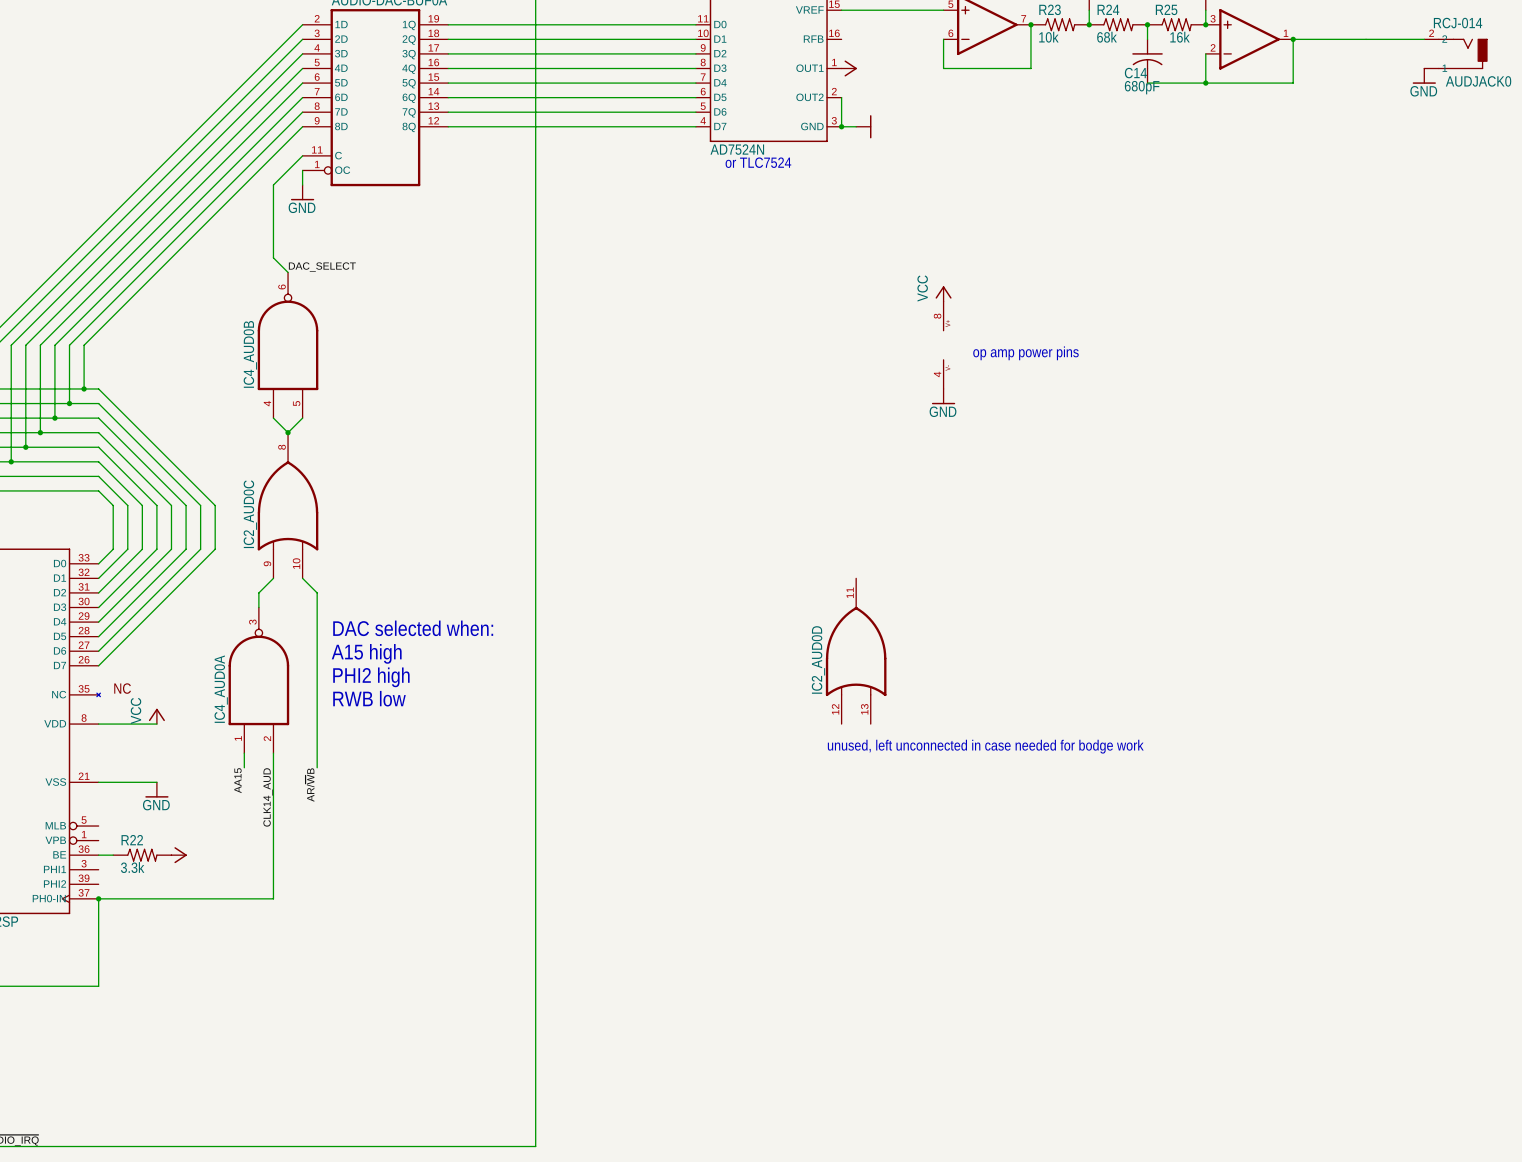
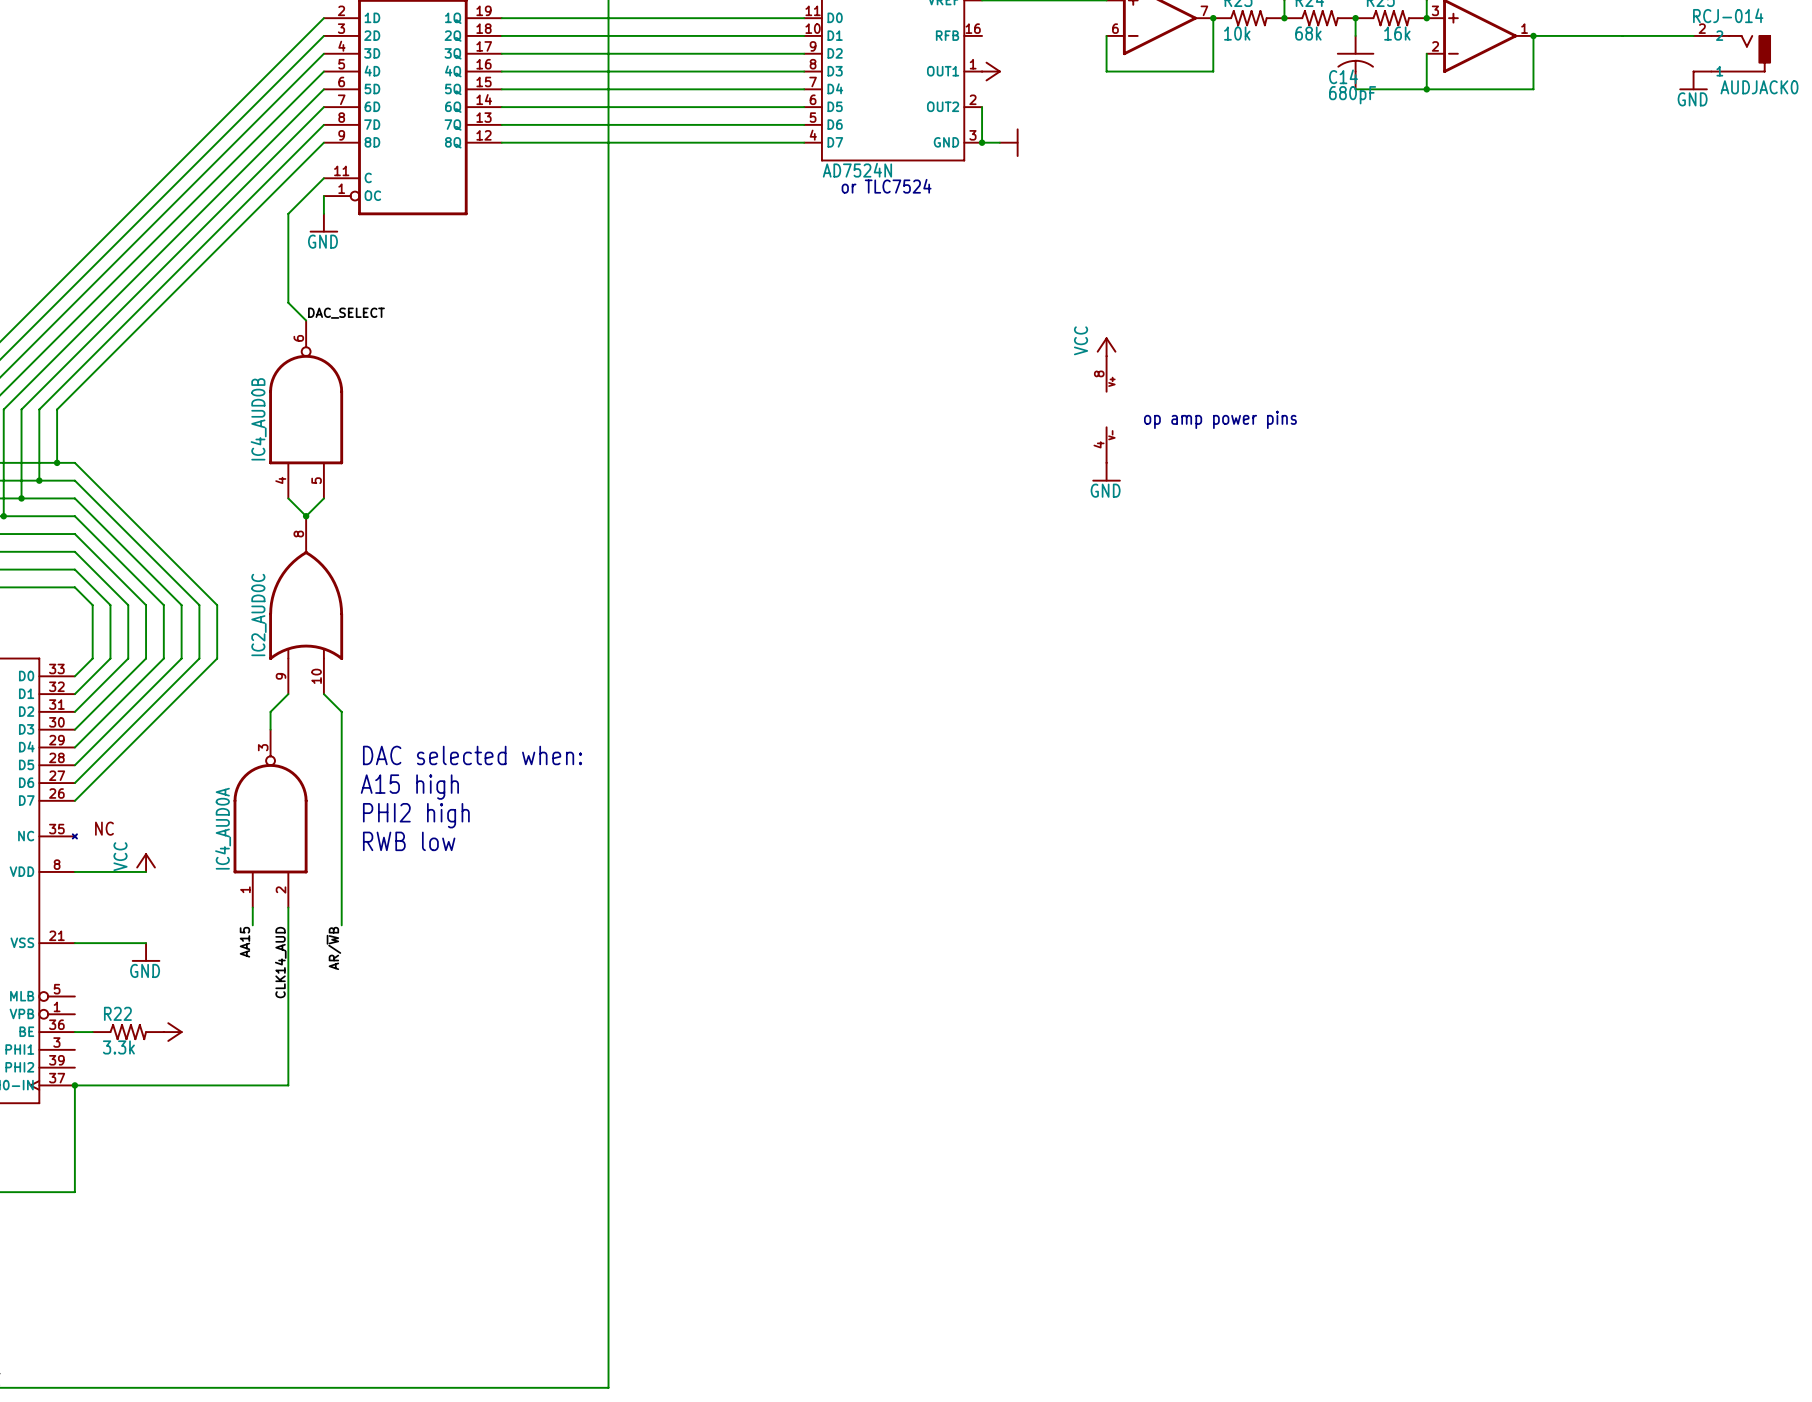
IC2_AUD0D: (856, 651) -> none
text: unused, left unconnected in case needed for bodge work (985, 746) -> none

